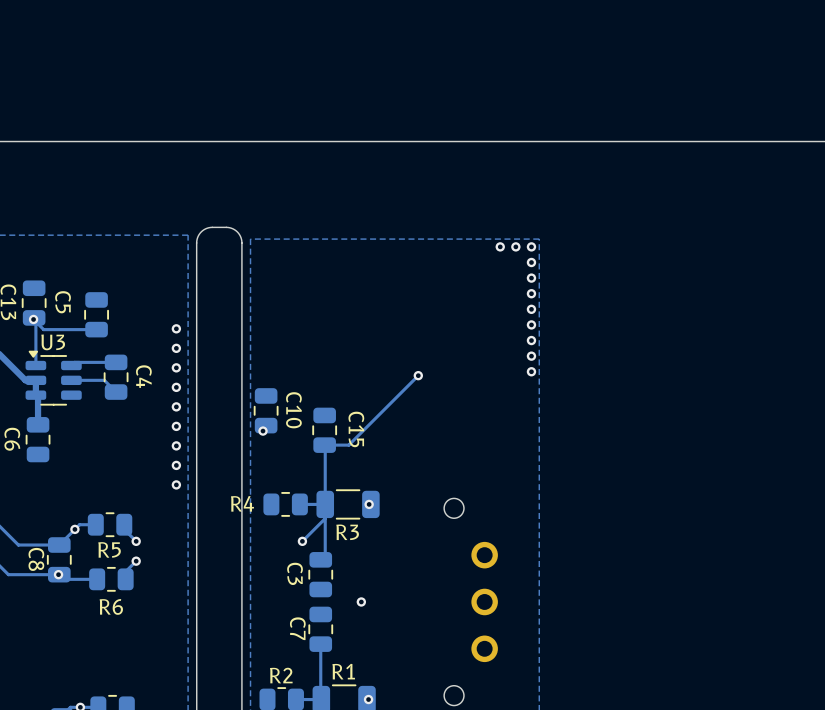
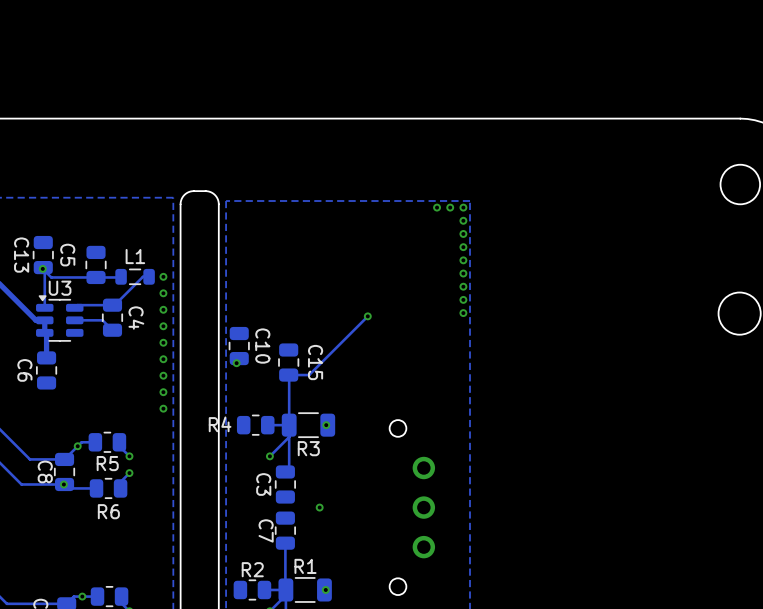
track: none -> (121, 276) (96, 277)
L1: none -> (135, 276)
track: none -> (149, 276) (142, 276) (112, 305)

